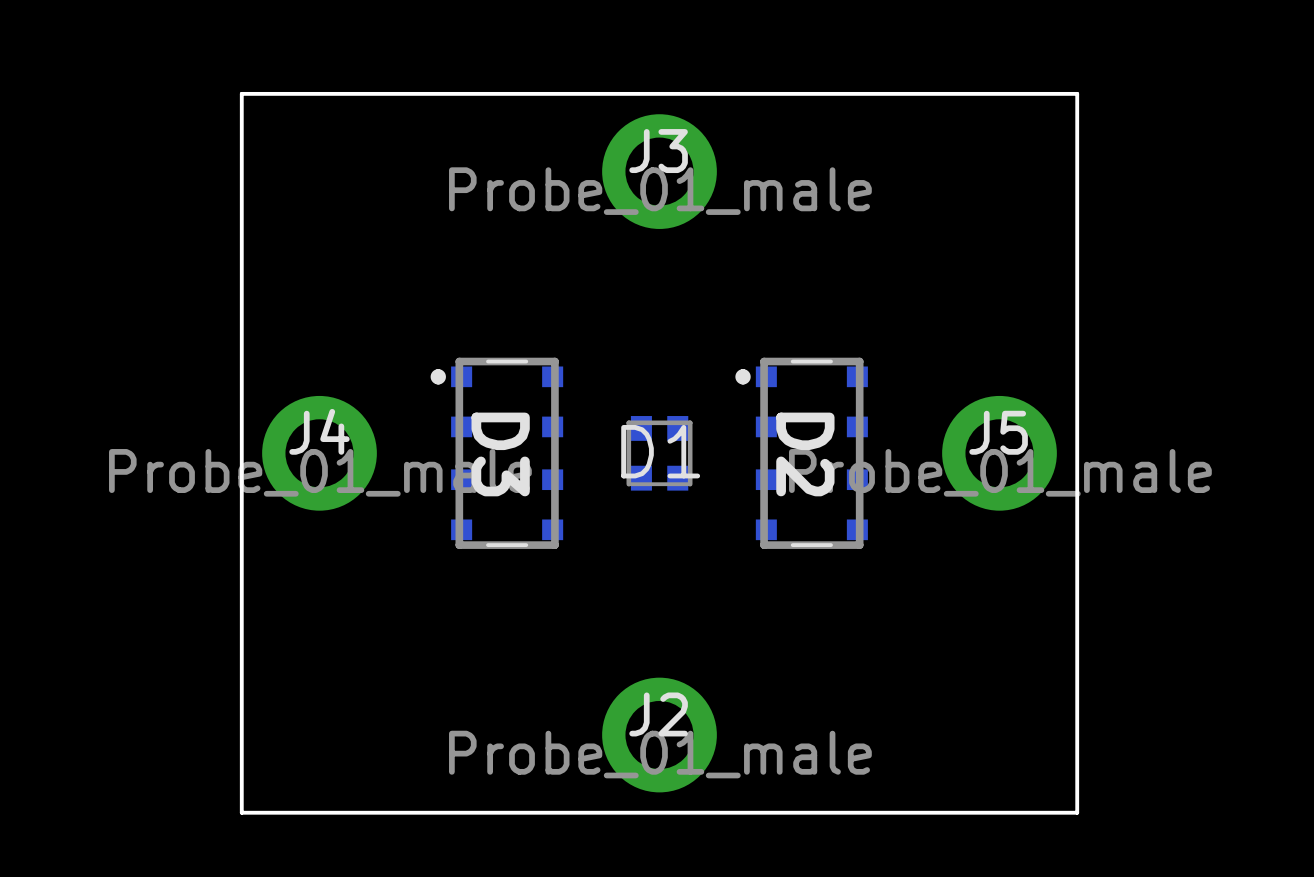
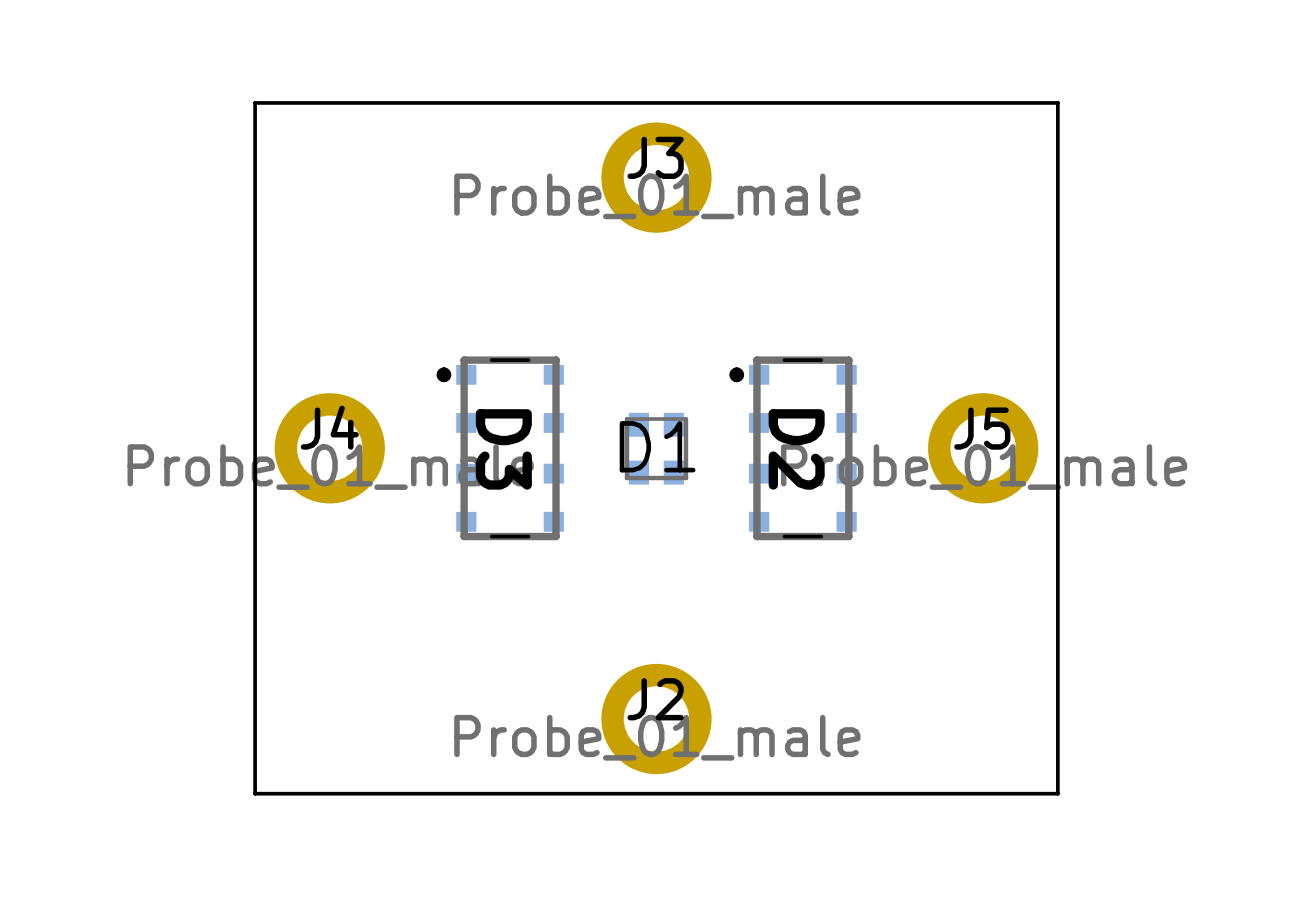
D1 rotation: 0° (659, 453) -> 180° (656, 448)

